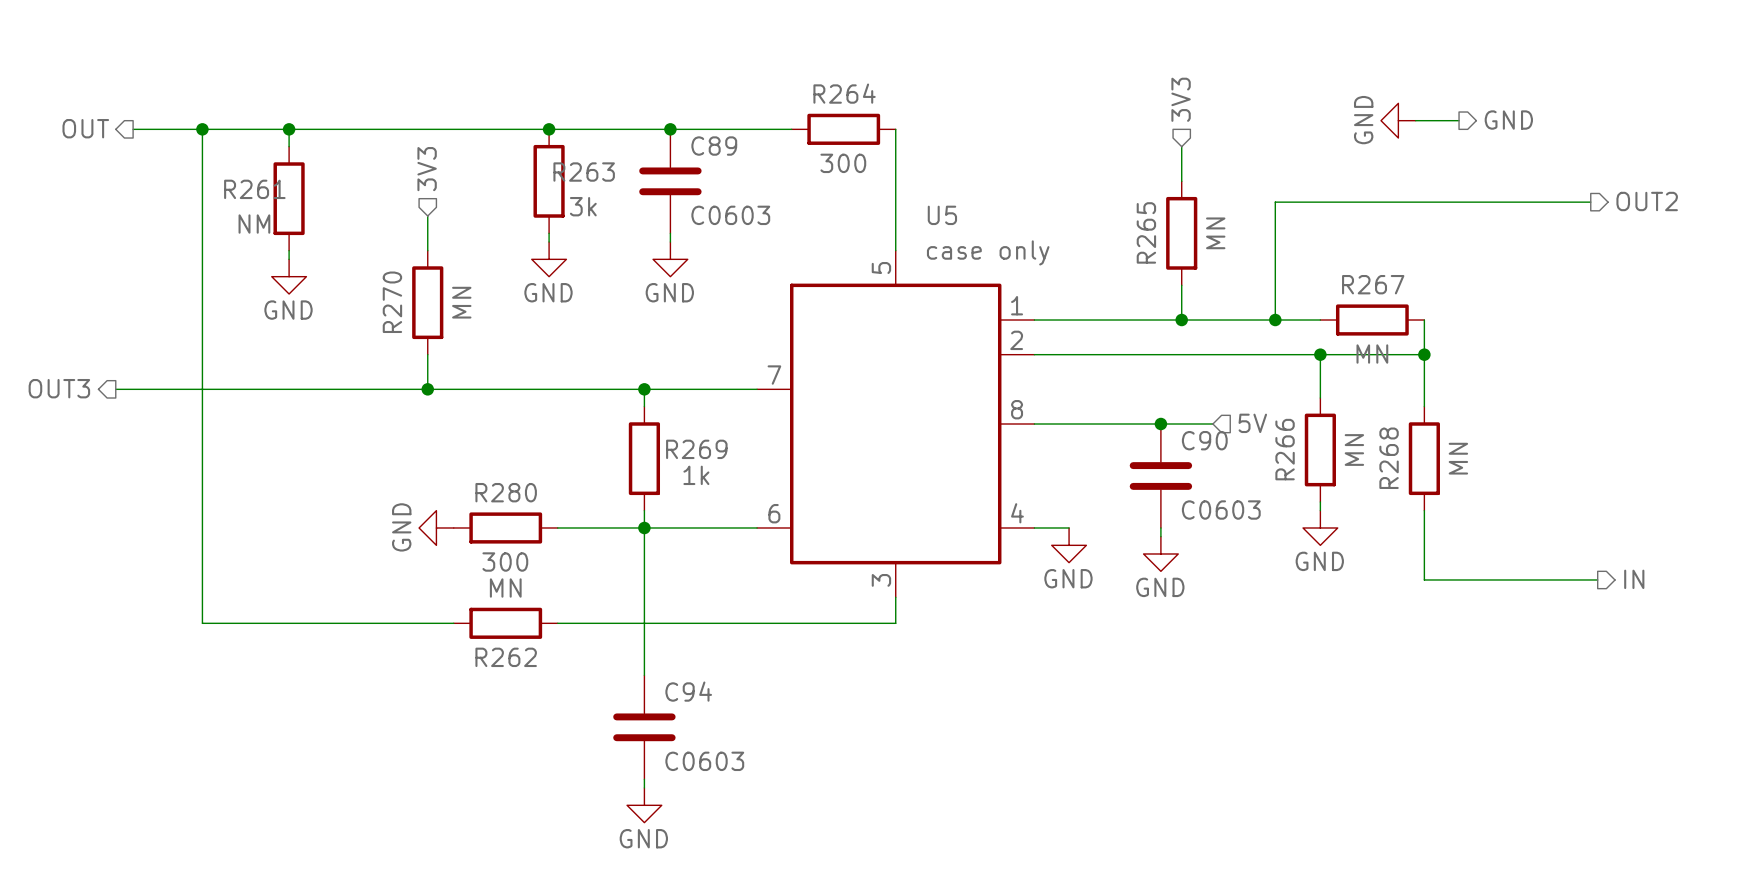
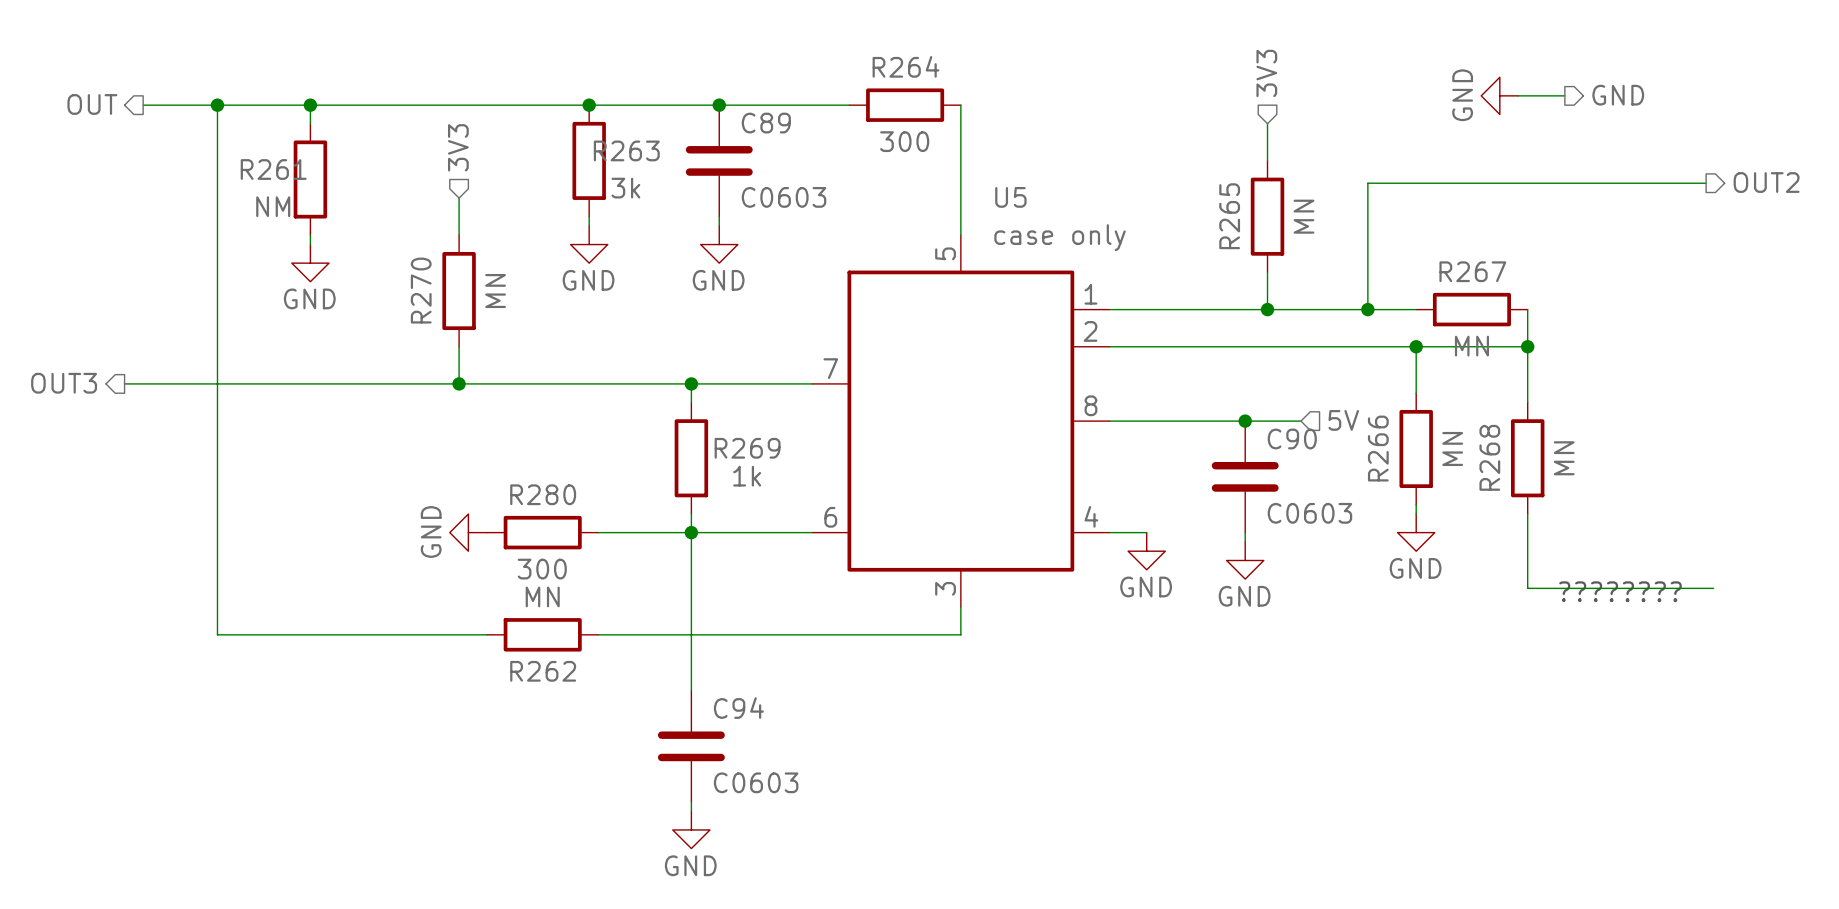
hierarchical label: IN (1634, 579) -> none
text: none -> ???????? (1620, 591)

